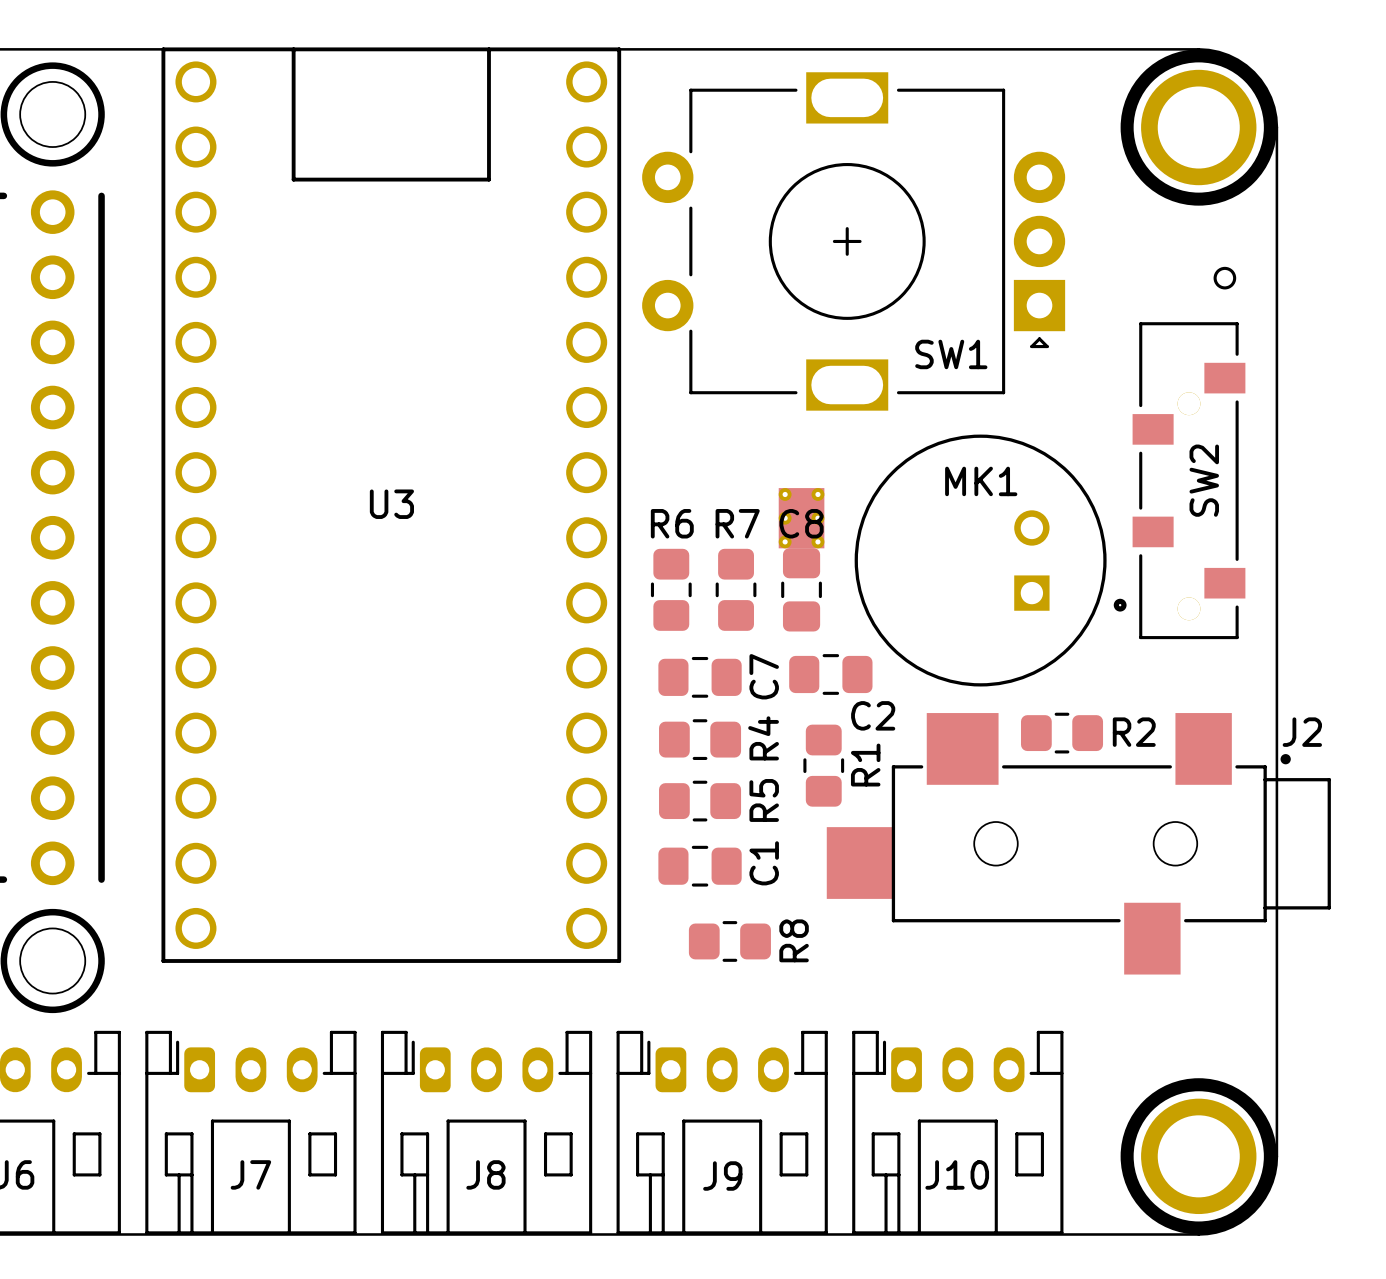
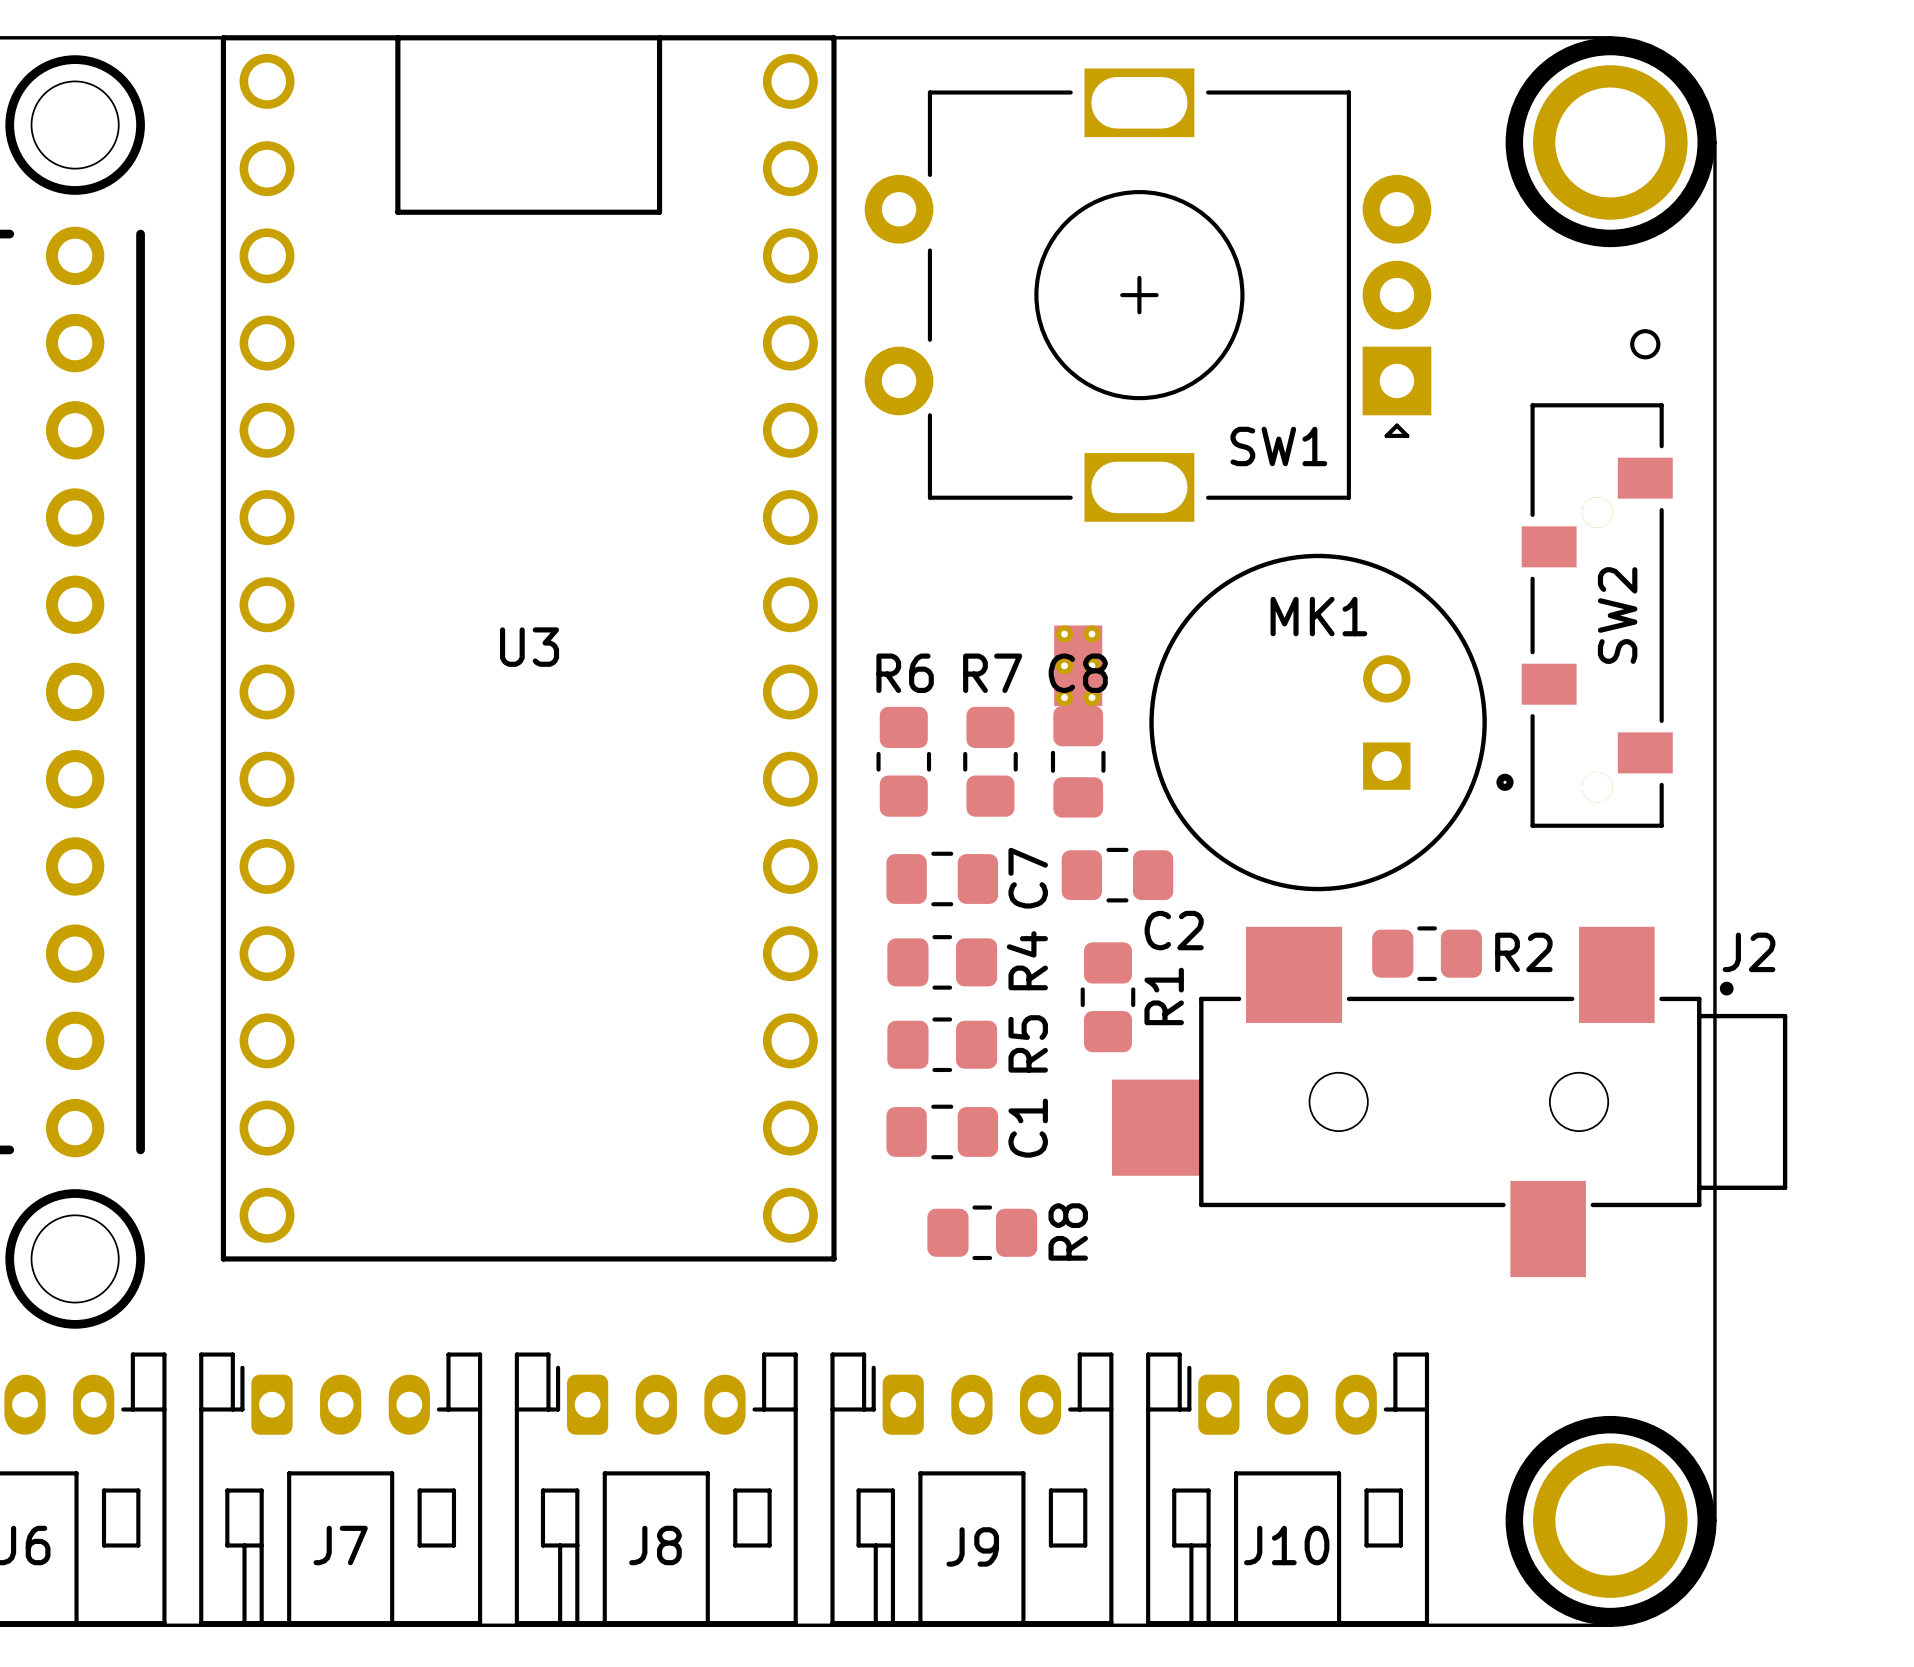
part footprint: [778, 488, 825, 549] -> [1054, 625, 1103, 707]

